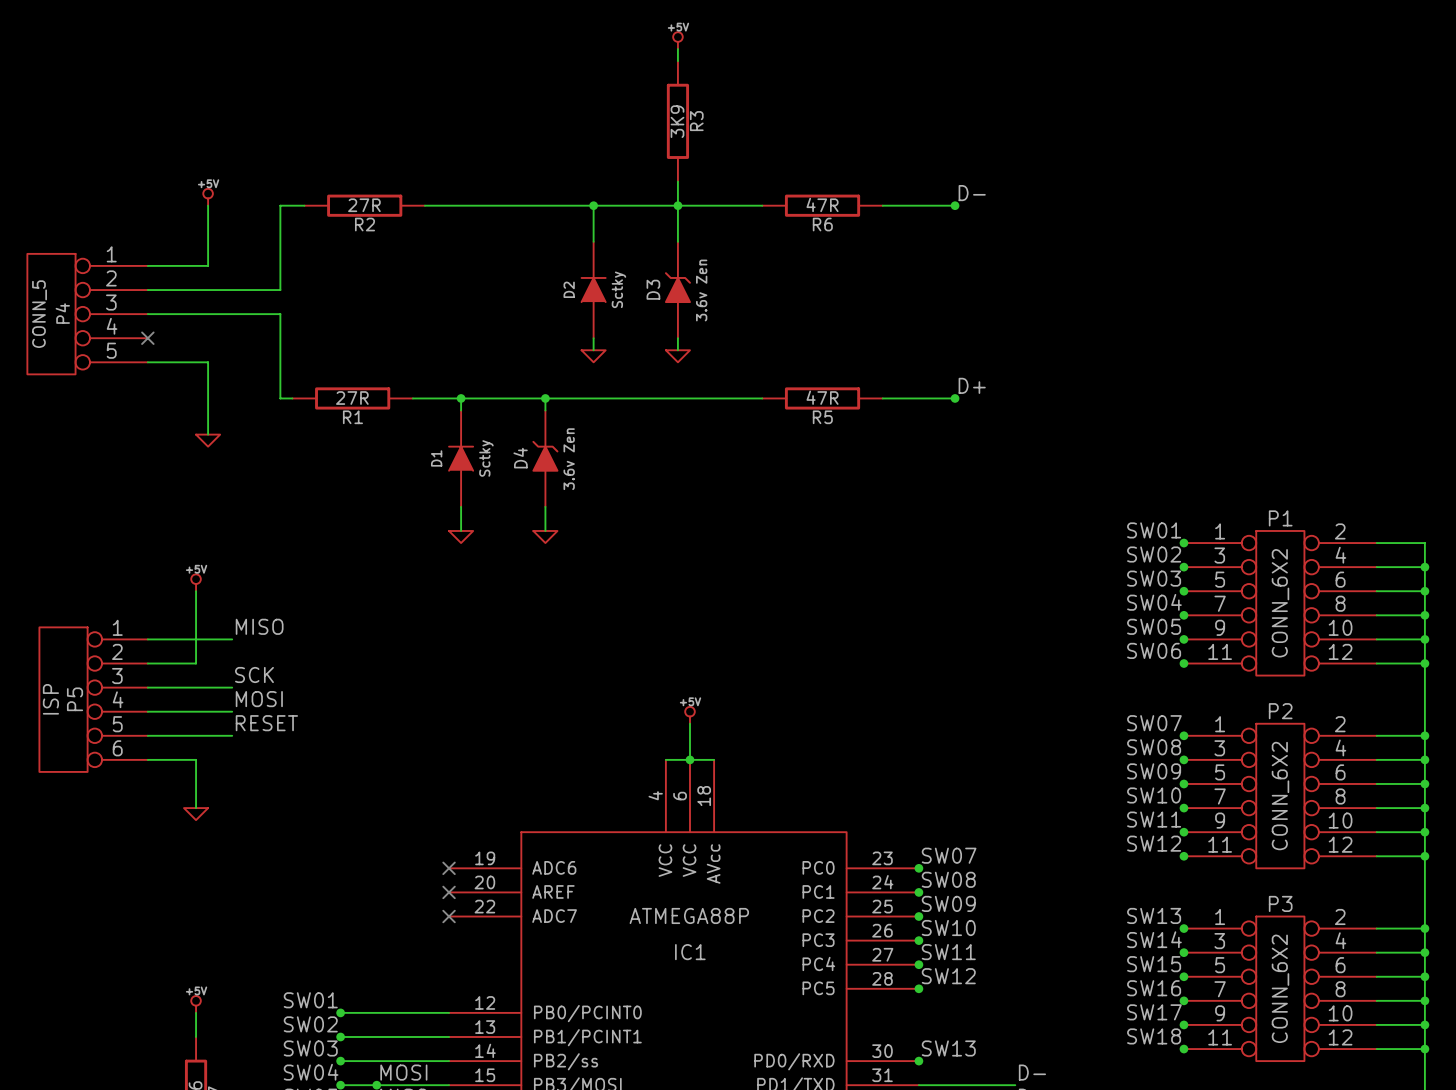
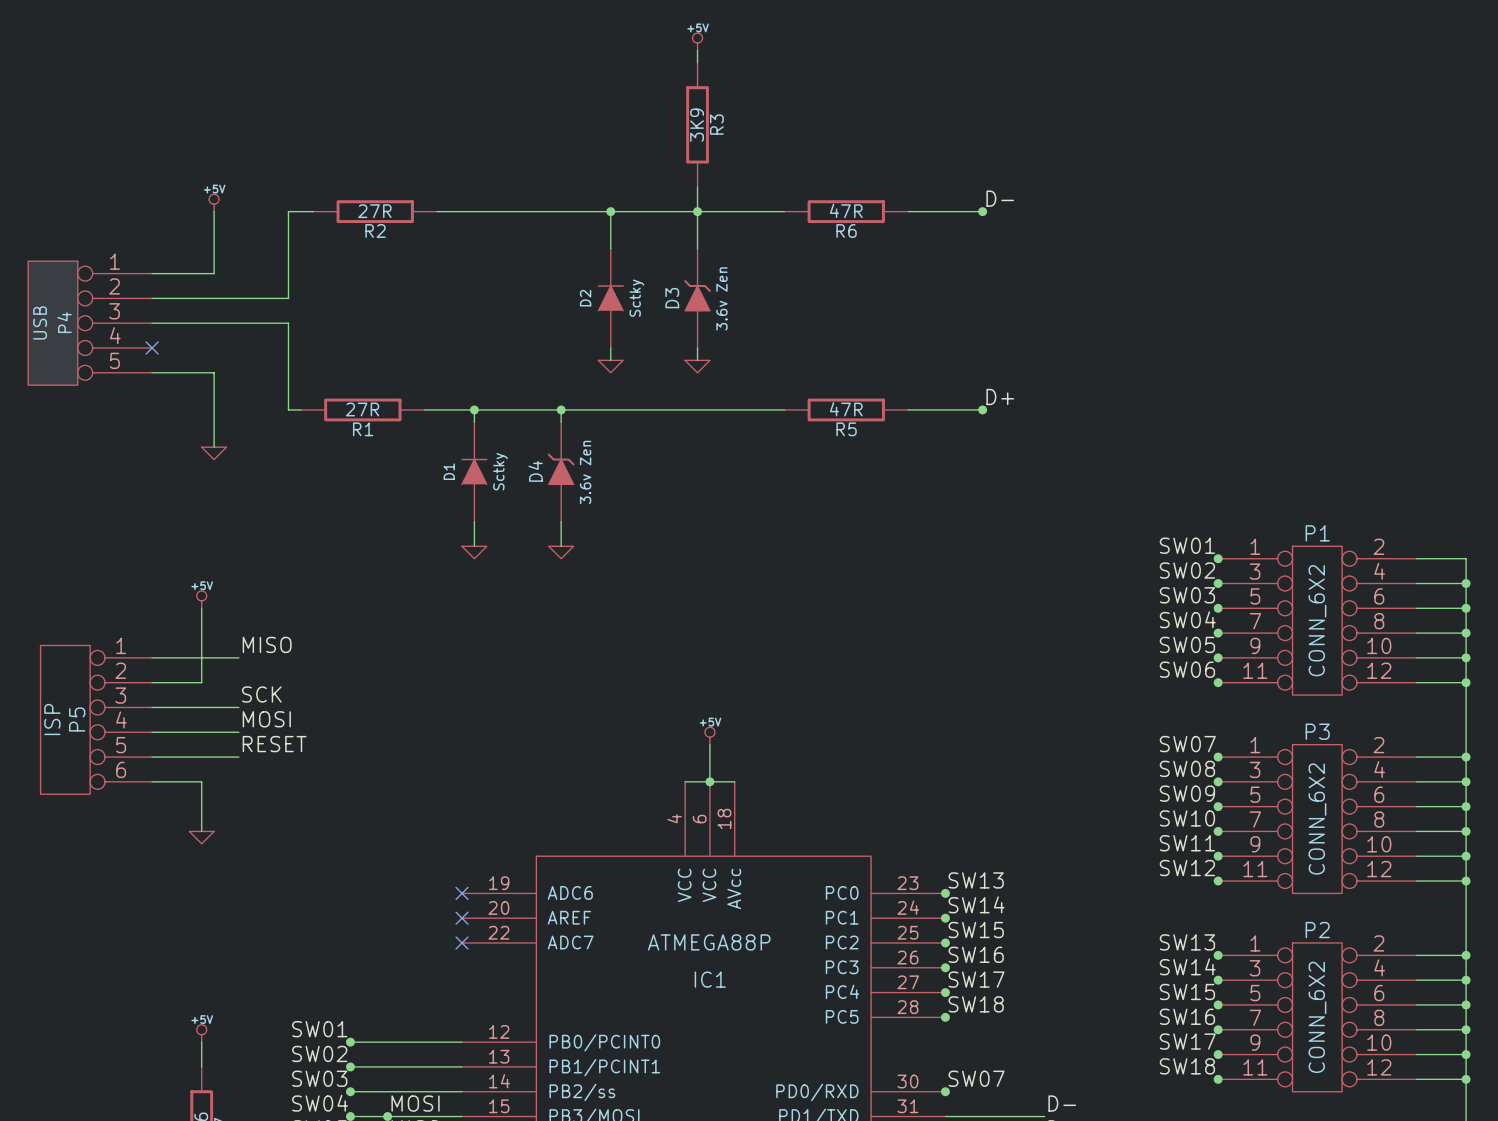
P4 value: CONN_5 (39, 314) -> USB (40, 322)
P2 name: P2 (1280, 711) -> P3 (1317, 731)
label: SW07 (949, 855) -> SW13 (976, 880)
label: SW08 (948, 879) -> SW14 (976, 904)
label: SW09 (948, 903) -> SW15 (976, 930)
P3 name: P3 (1280, 903) -> P2 (1317, 930)
label: SW10 (948, 928) -> SW16 (976, 954)
label: SW11 (948, 952) -> SW17 (976, 979)
label: SW12 (948, 976) -> SW18 (976, 1004)
label: SW13 (948, 1048) -> SW07 (976, 1078)

